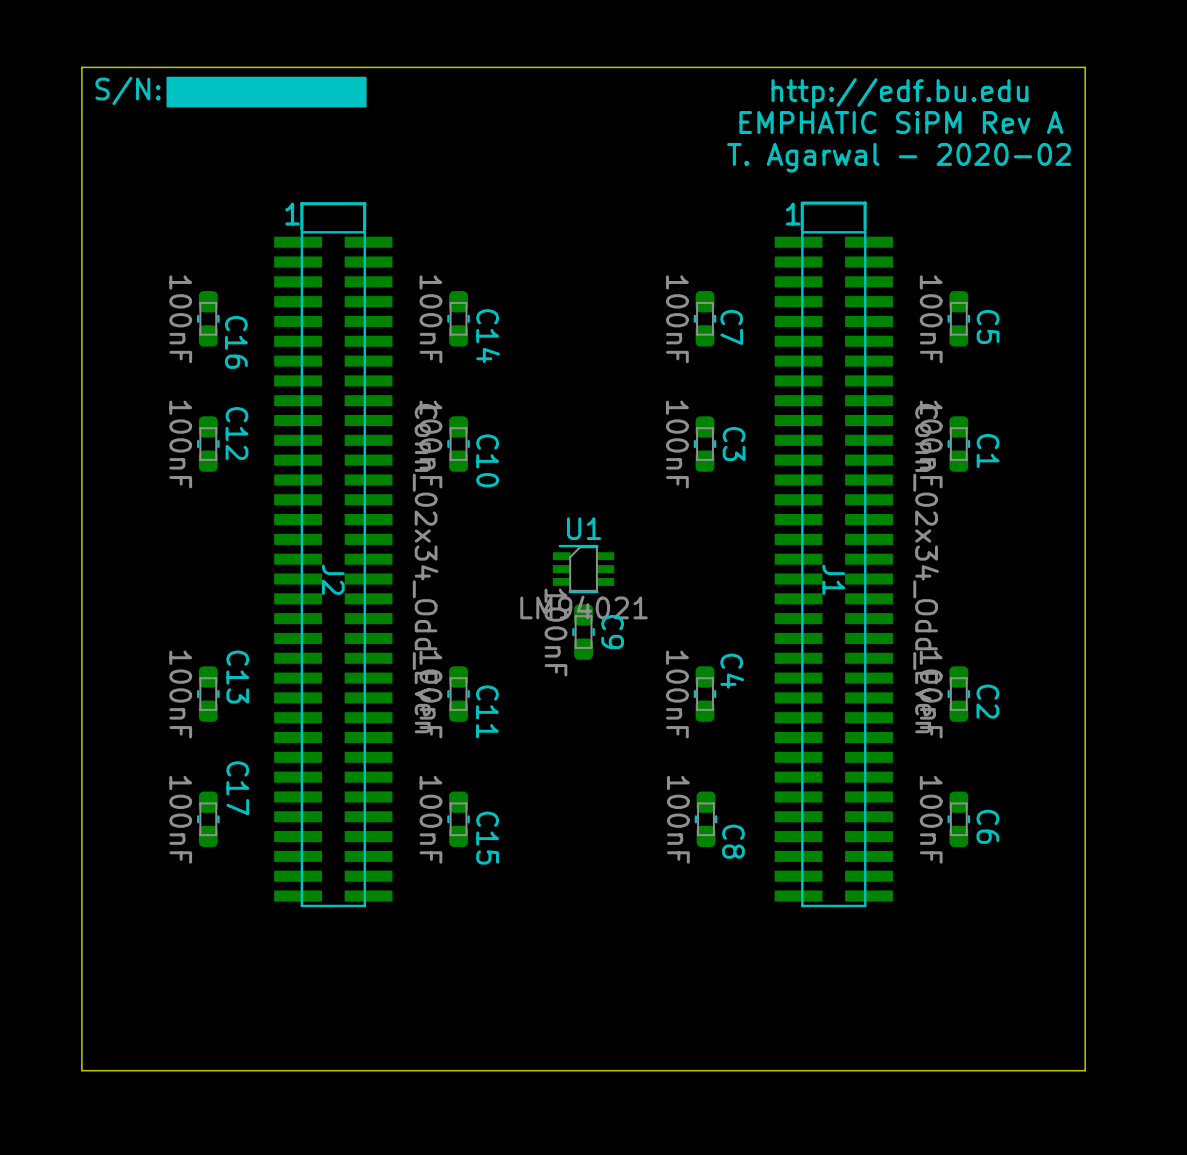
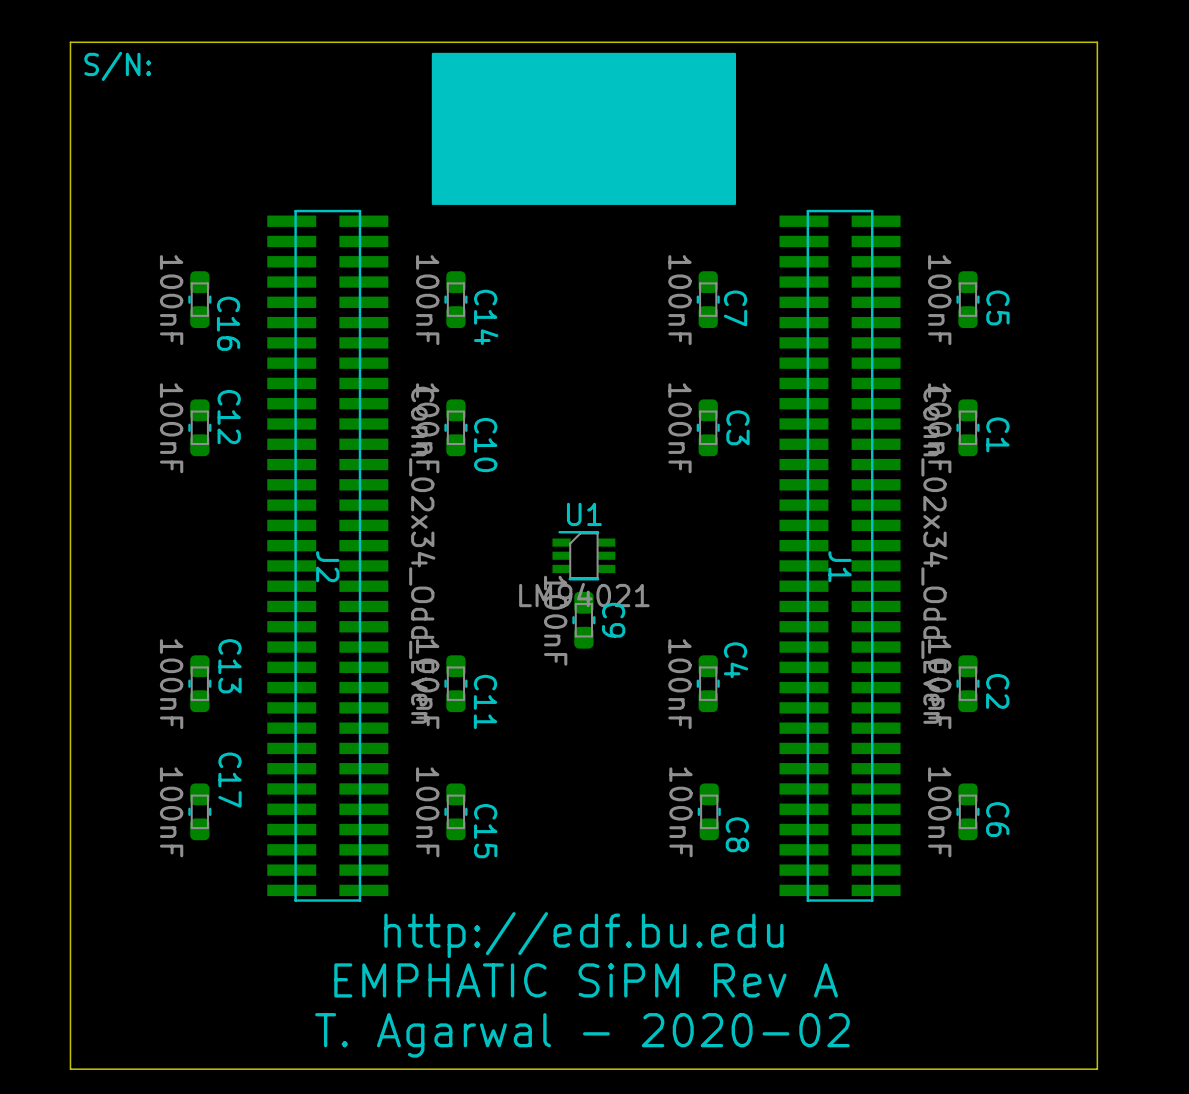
drawing: [166, 76, 367, 108] -> none
drawing: none -> [431, 52, 736, 205]
text: http://edf.bu.edu (899, 93) -> none
text: EMPHATIC SiPM Rev A (901, 122) -> none
text: T. Agarwal - 2020-02 (899, 157) -> none
line: (802, 203) (865, 203) (865, 229) -> none
line: (802, 203) (802, 229) -> none
text: 1 (292, 214) -> none
text: 1 (793, 214) -> none
line: (301, 229) (301, 203) (364, 203) (364, 230) -> none
text: none -> http://edf.bu.edu (583, 935)
text: none -> EMPHATIC SiPM Rev A (586, 980)
text: none -> T. Agarwal - 2020-02 (582, 1035)

